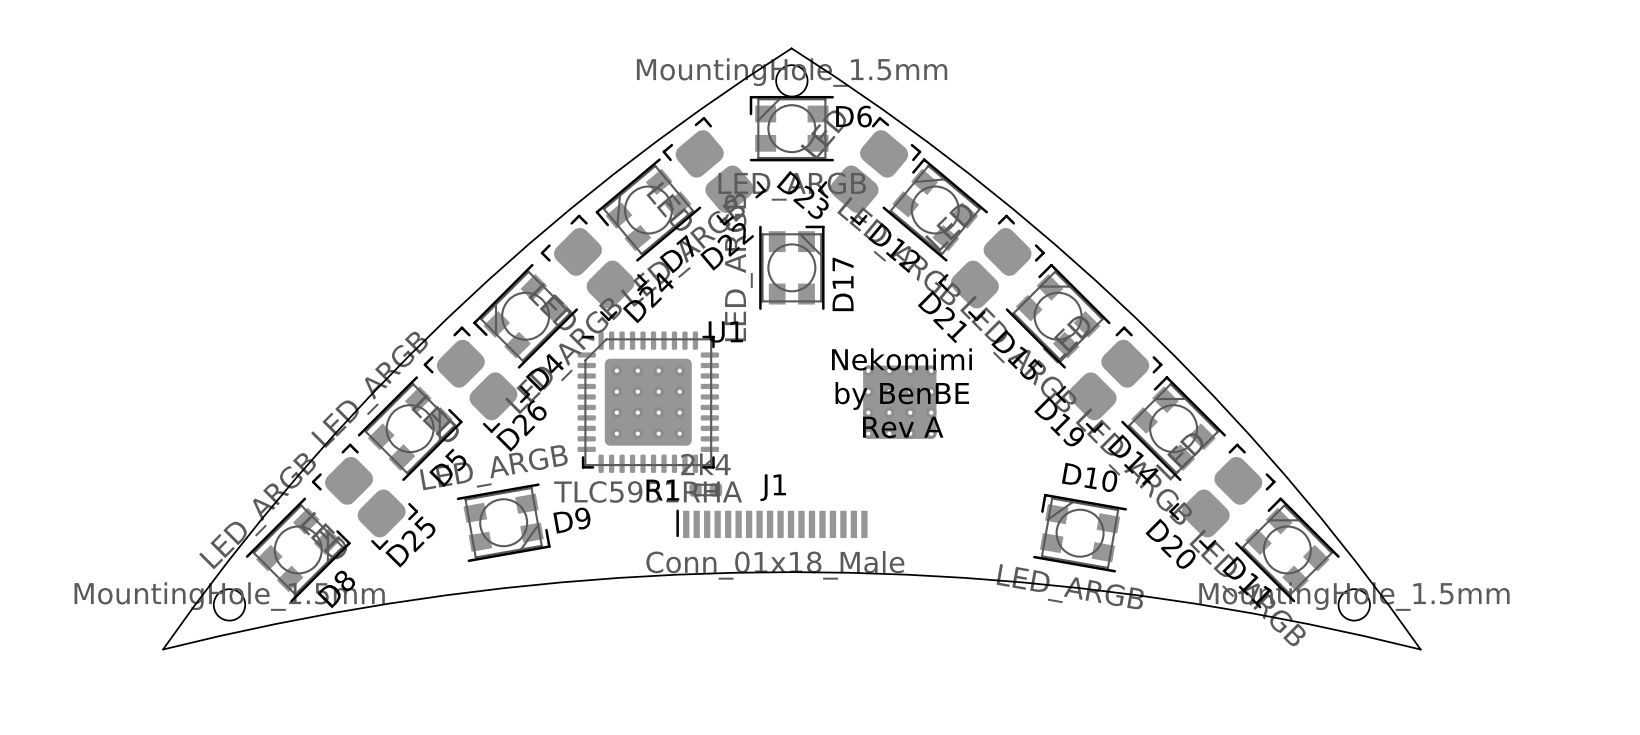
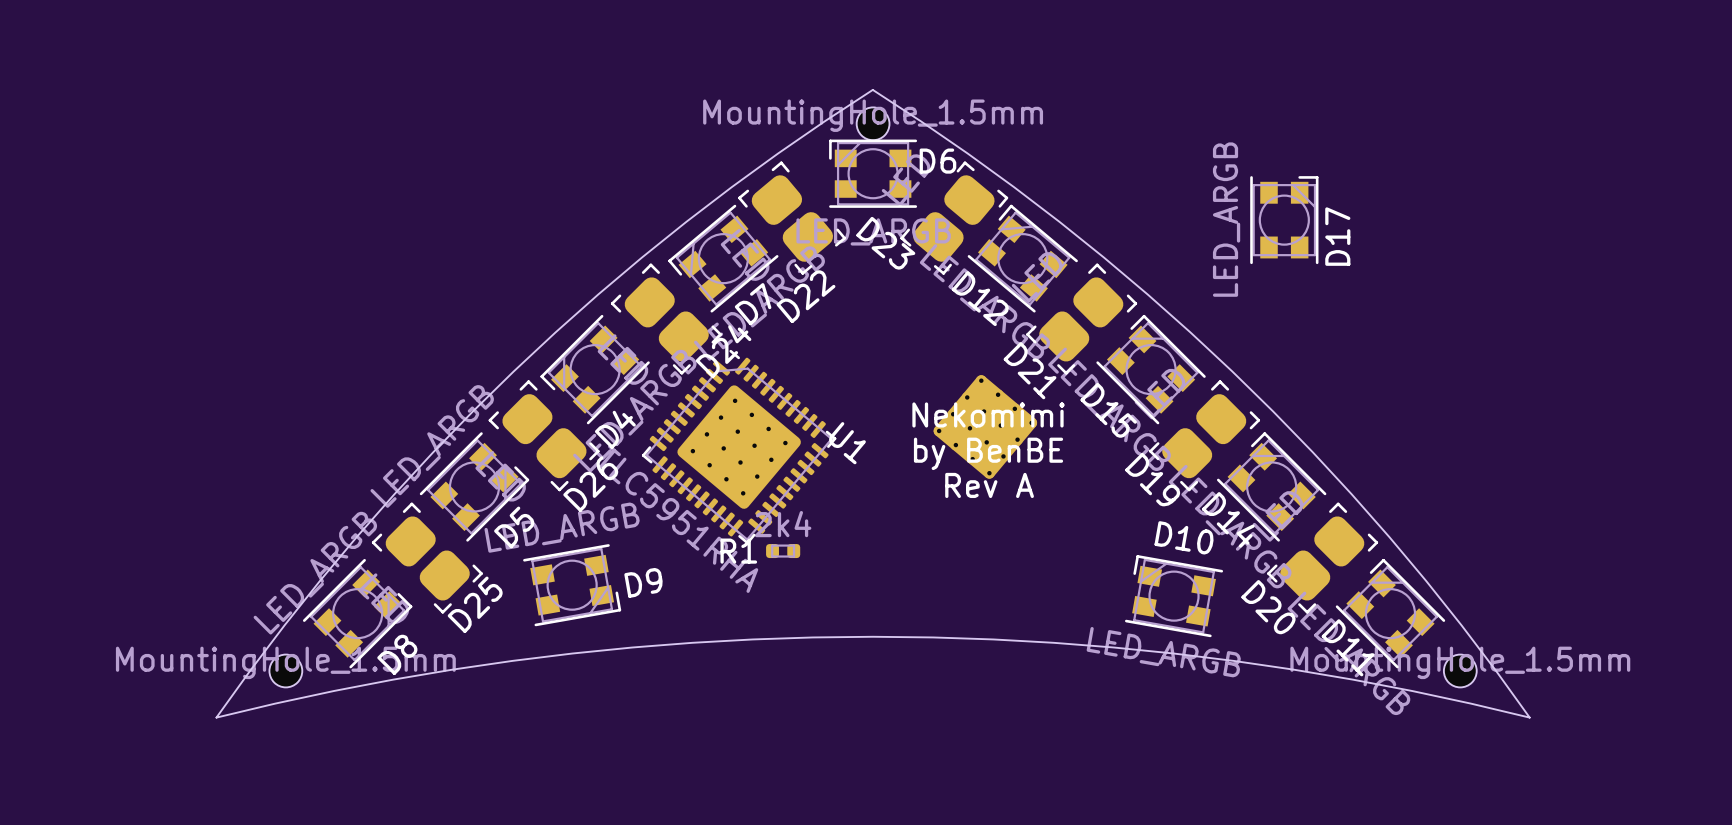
D17 position: (791, 267) -> (1284, 220)
part: none -> (985, 426)
U1 rotation: 0° (648, 402) -> 40° clockwise (739, 447)
part: (899, 402) -> none
J1: Conn_01x18_Male (771, 523) -> none

